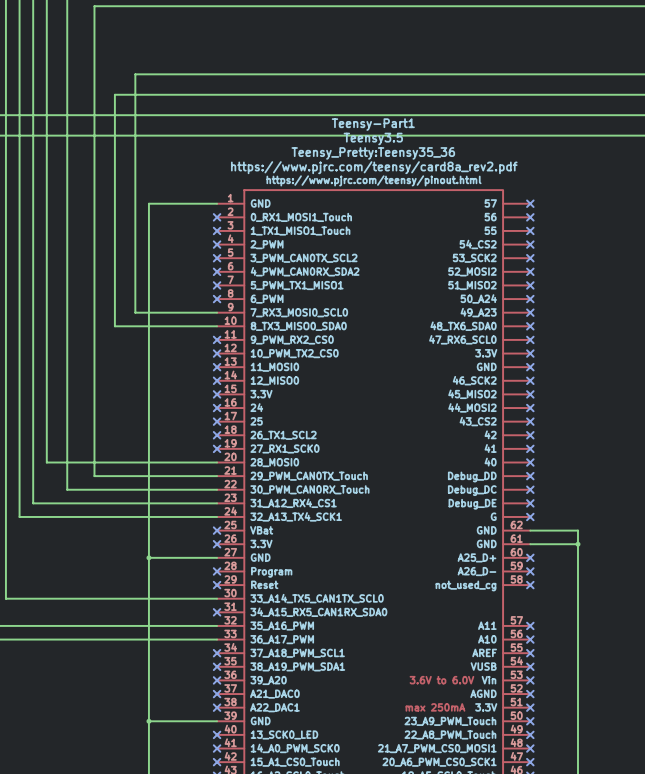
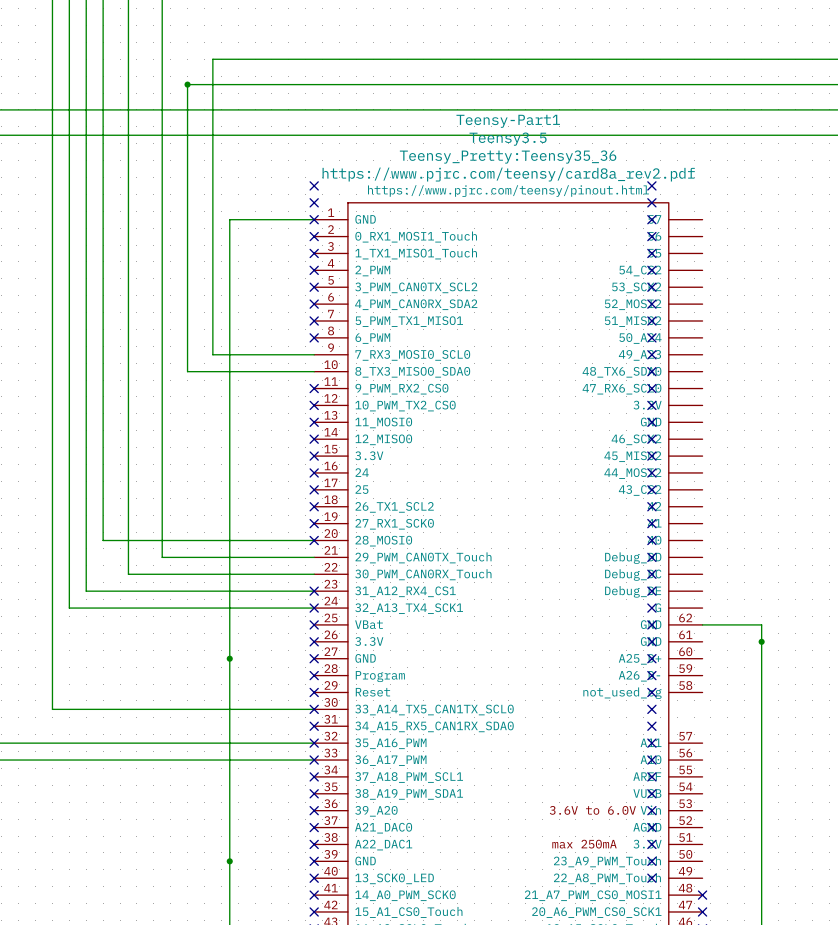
junction: none -> (187, 84)
no-connect mark: none -> (314, 185)
no-connect mark: none -> (651, 185)
no-connect mark: none -> (314, 202)
no-connect mark: none -> (651, 202)
no-connect mark: none -> (314, 219)
no-connect mark: none -> (651, 219)
no-connect mark: (530, 203) -> none
no-connect mark: none -> (651, 236)
no-connect mark: (530, 217) -> none
no-connect mark: none -> (651, 253)
no-connect mark: (530, 230) -> none
no-connect mark: none -> (651, 270)
no-connect mark: (530, 244) -> none
no-connect mark: none -> (651, 287)
no-connect mark: (530, 258) -> none
no-connect mark: none -> (651, 304)
no-connect mark: (530, 271) -> none
no-connect mark: none -> (651, 320)
no-connect mark: (530, 285) -> none
no-connect mark: none -> (651, 337)
no-connect mark: (530, 299) -> none
no-connect mark: none -> (651, 354)
no-connect mark: (530, 312) -> none
no-connect mark: none -> (651, 371)
no-connect mark: (530, 326) -> none
no-connect mark: none -> (651, 388)
no-connect mark: (530, 339) -> none
no-connect mark: none -> (651, 405)
no-connect mark: (530, 353) -> none
no-connect mark: none -> (651, 422)
no-connect mark: (530, 367) -> none
no-connect mark: none -> (651, 439)
no-connect mark: (530, 380) -> none
no-connect mark: none -> (651, 456)
no-connect mark: (530, 394) -> none
no-connect mark: none -> (651, 472)
no-connect mark: (530, 408) -> none
no-connect mark: none -> (651, 489)
no-connect mark: (530, 421) -> none
no-connect mark: none -> (651, 506)
no-connect mark: (530, 435) -> none
no-connect mark: none -> (651, 523)
no-connect mark: (530, 448) -> none
no-connect mark: none -> (314, 540)
no-connect mark: none -> (651, 540)
no-connect mark: (530, 462) -> none
no-connect mark: none -> (651, 557)
no-connect mark: (530, 476) -> none
no-connect mark: none -> (651, 574)
no-connect mark: (530, 489) -> none
no-connect mark: none -> (314, 591)
no-connect mark: none -> (651, 591)
no-connect mark: (530, 503) -> none
no-connect mark: none -> (314, 608)
no-connect mark: none -> (651, 608)
no-connect mark: (530, 516) -> none
no-connect mark: none -> (651, 624)
no-connect mark: none -> (651, 641)
wire: (530, 544) (577, 544) -> none
wire: (148, 557) (217, 557) -> none
no-connect mark: none -> (314, 658)
no-connect mark: none -> (651, 658)
no-connect mark: (530, 557) -> none
no-connect mark: none -> (651, 675)
no-connect mark: (530, 571) -> none
no-connect mark: none -> (651, 692)
no-connect mark: (530, 585) -> none
no-connect mark: none -> (314, 709)
no-connect mark: none -> (651, 709)
no-connect mark: none -> (651, 726)
no-connect mark: none -> (314, 743)
no-connect mark: none -> (651, 743)
no-connect mark: (530, 625) -> none
no-connect mark: none -> (314, 760)
no-connect mark: none -> (651, 760)
no-connect mark: (530, 639) -> none
no-connect mark: none -> (651, 776)
no-connect mark: (530, 653) -> none
no-connect mark: none -> (651, 793)
no-connect mark: (530, 666) -> none
no-connect mark: none -> (651, 810)
no-connect mark: (530, 680) -> none
no-connect mark: none -> (651, 827)
no-connect mark: (530, 694) -> none
no-connect mark: none -> (651, 844)
no-connect mark: (530, 707) -> none
wire: (148, 721) (217, 721) -> none
no-connect mark: none -> (314, 861)
no-connect mark: none -> (651, 861)
no-connect mark: (530, 721) -> none
no-connect mark: none -> (651, 878)
no-connect mark: (530, 734) -> none

